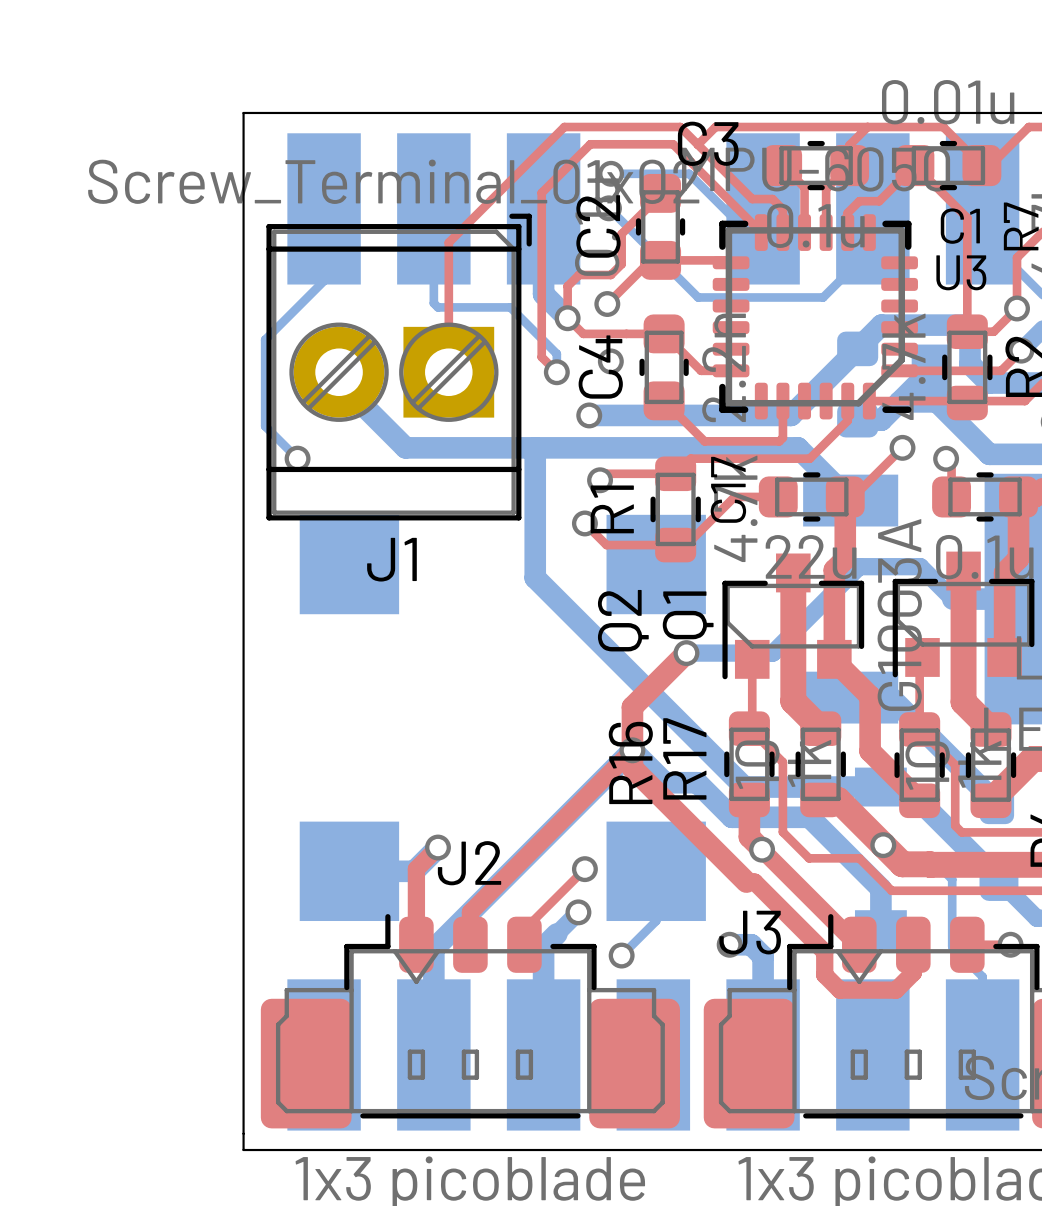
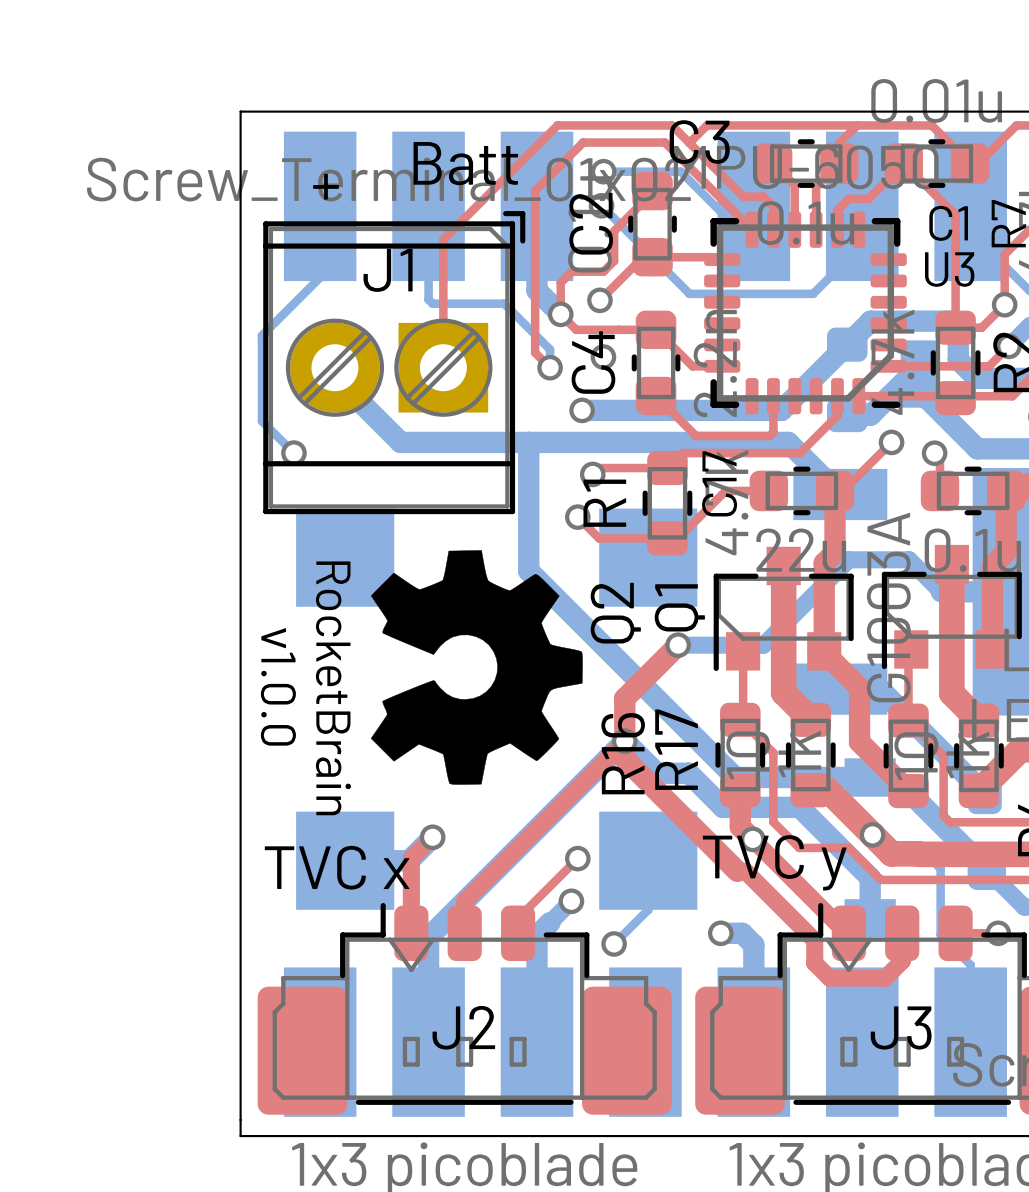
text: none -> Batt (465, 163)
text: none -> + (325, 186)
drawing: none -> [370, 550, 583, 785]
J1 name position: J1 (391, 559) -> J1 (388, 270)
text: none -> v1.0.0 (278, 686)
text: none -> RocketBrain (333, 688)
J2 name position: J2 (469, 863) -> J2 (463, 1027)
text: none -> TVC y (774, 862)
text: none -> TVC x (337, 867)
J3 name position: J3 (750, 932) -> J3 (901, 1027)

